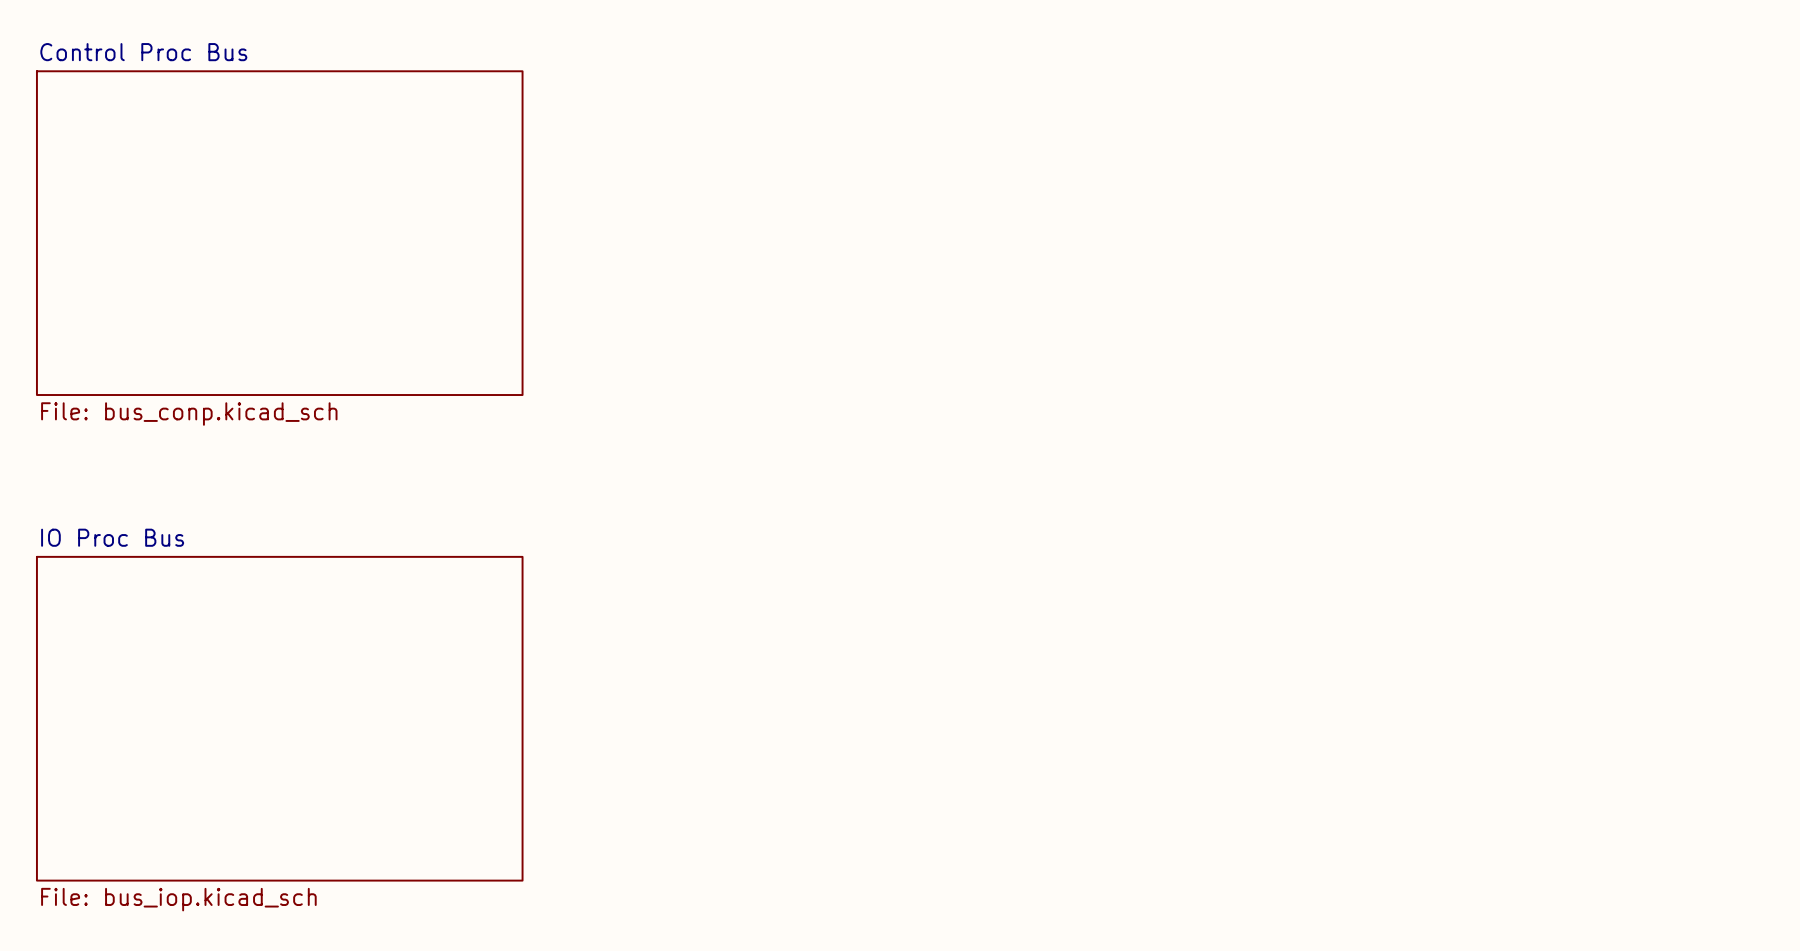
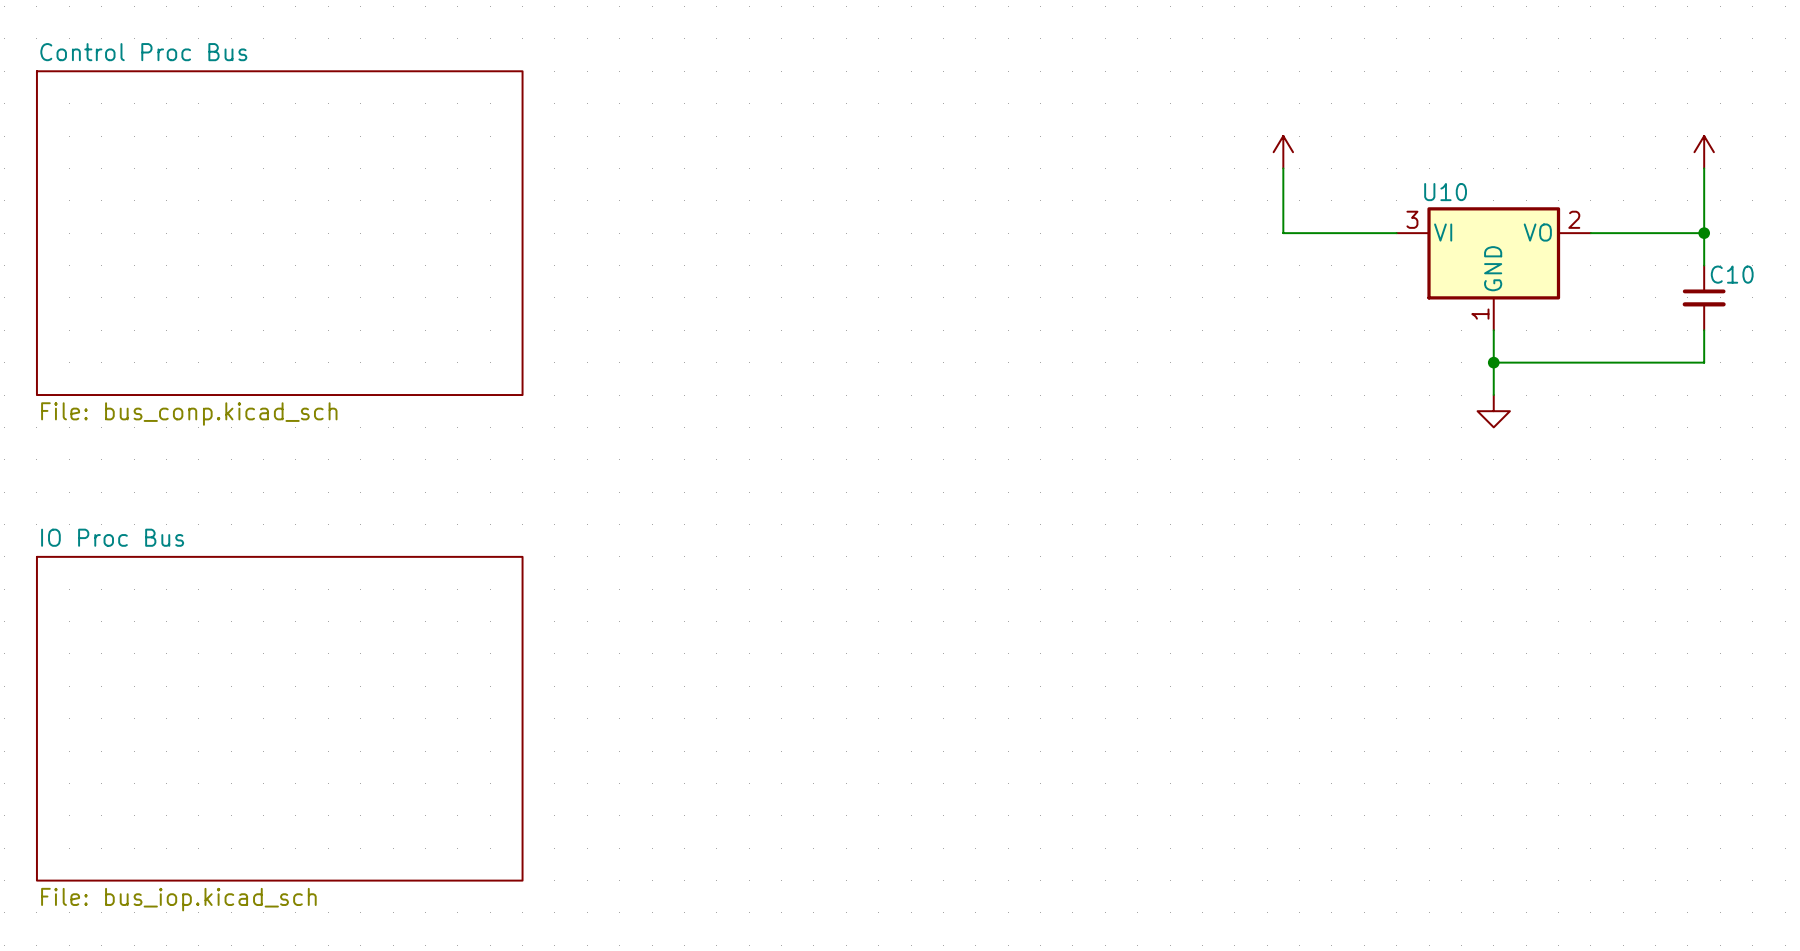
power symbol: none -> (1283, 152)
power symbol: none -> (1704, 152)
wire: none -> (1283, 168) (1283, 233) (1396, 233)
wire: none -> (1704, 168) (1704, 265)
wire: none -> (1590, 233) (1704, 233)
junction: none -> (1704, 233)
U10: none -> (1493, 268)
C10: none -> (1704, 297)
wire: none -> (1493, 330) (1493, 395)
wire: none -> (1704, 330) (1704, 362) (1493, 362)
junction: none -> (1493, 362)
power symbol: none -> (1493, 411)

